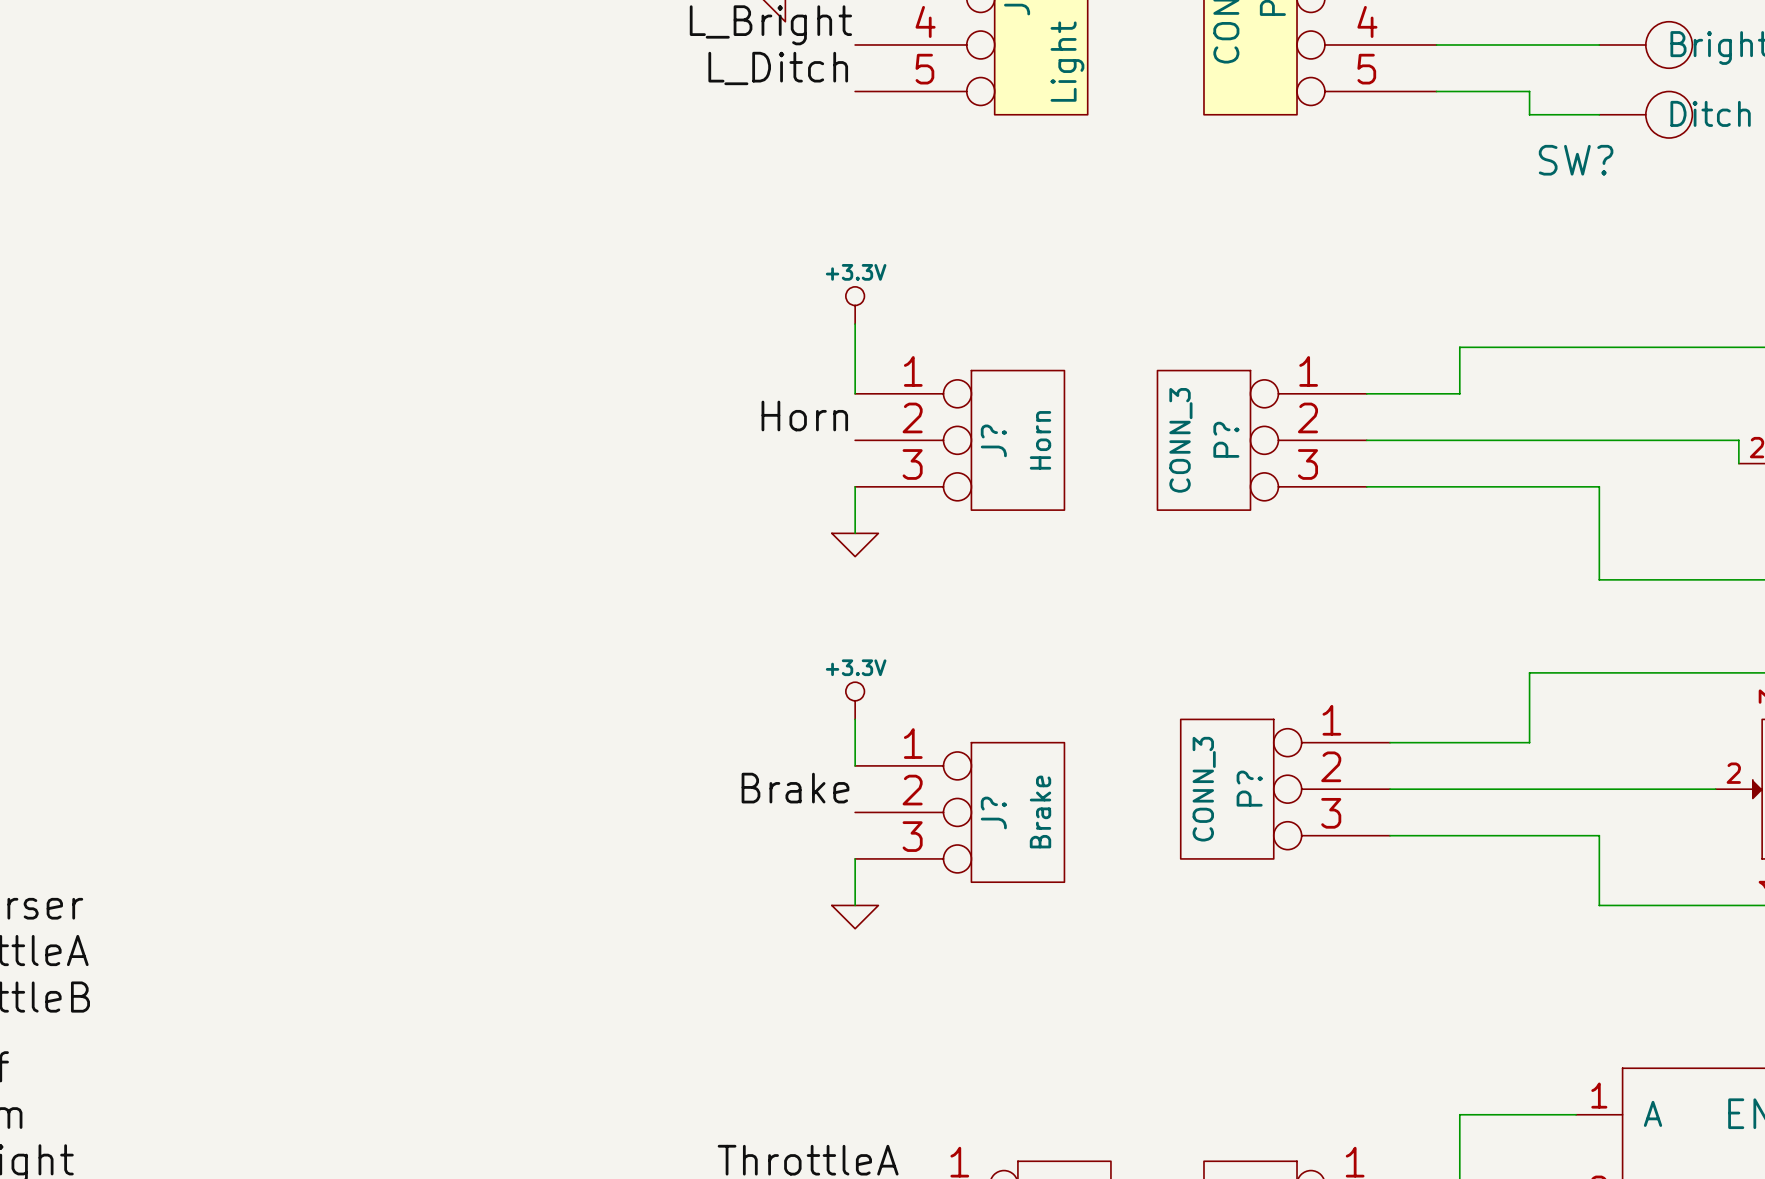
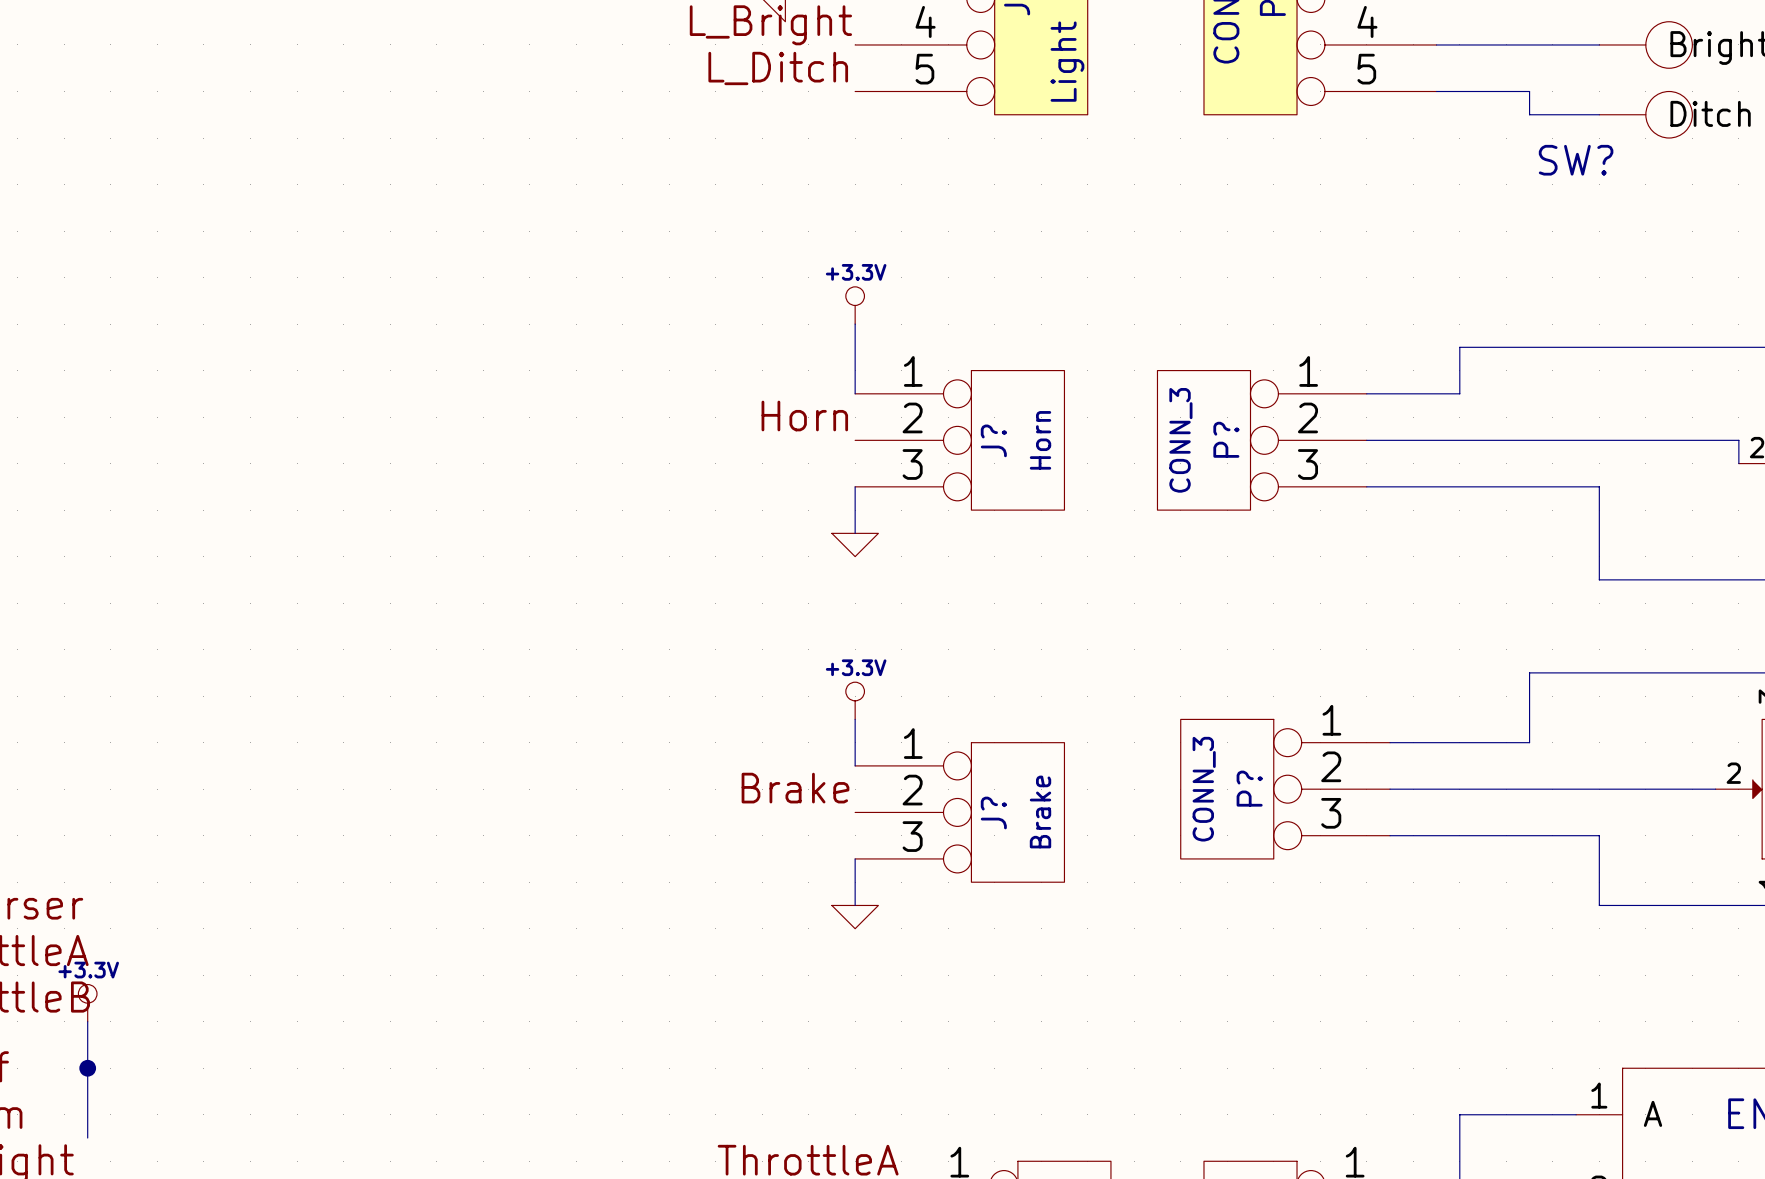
power symbol: none -> +3.3V (87, 1003)
wire: none -> (87, 1021) (87, 1138)
junction: none -> (87, 1068)

